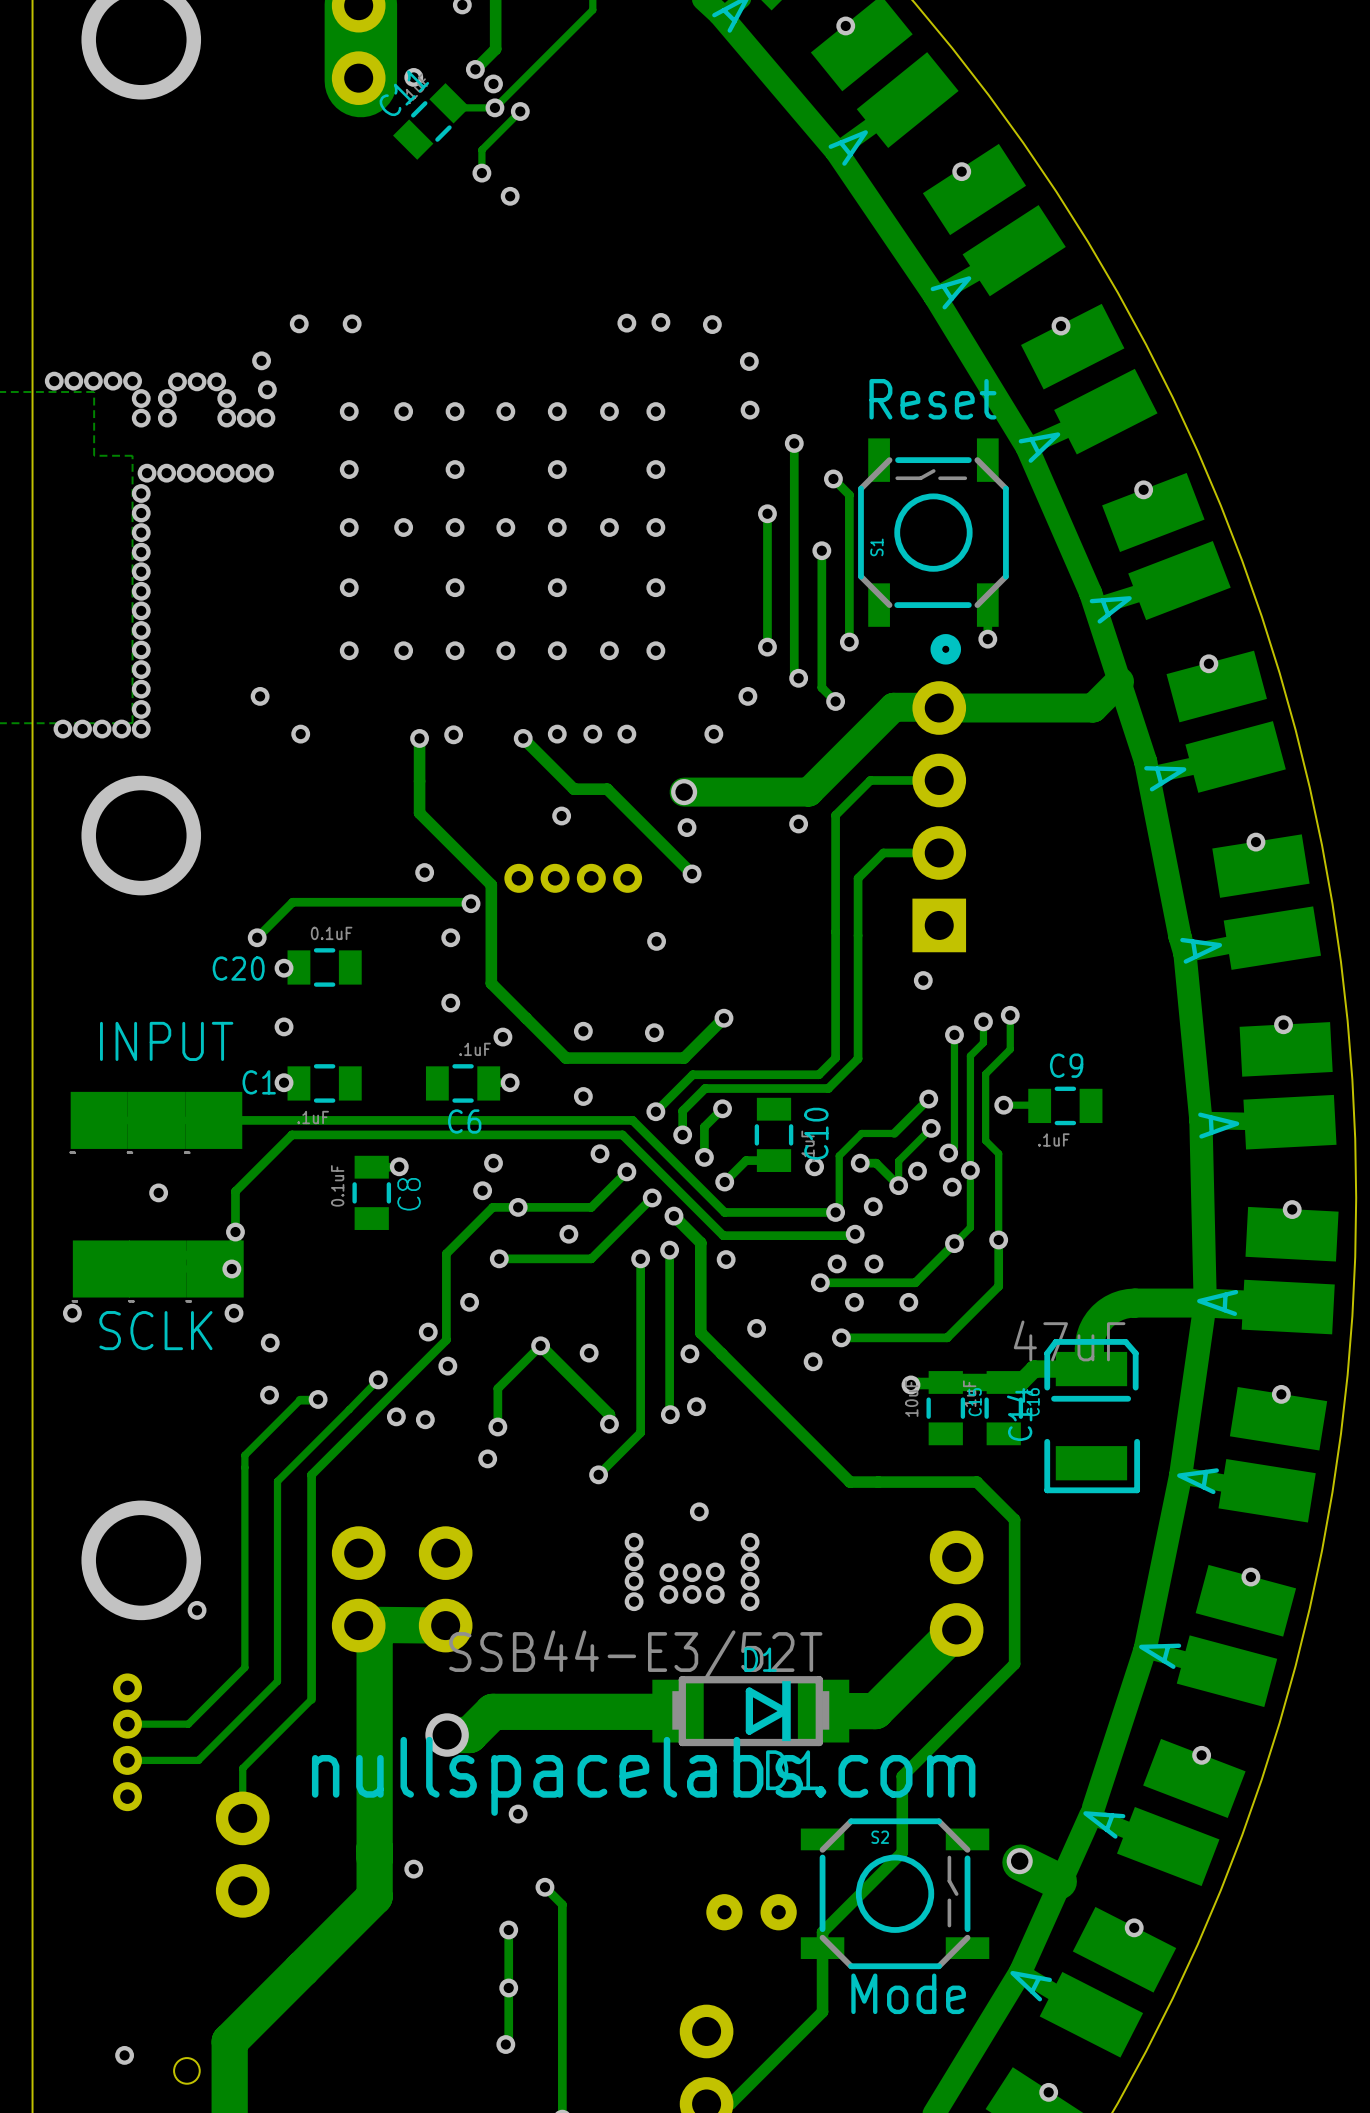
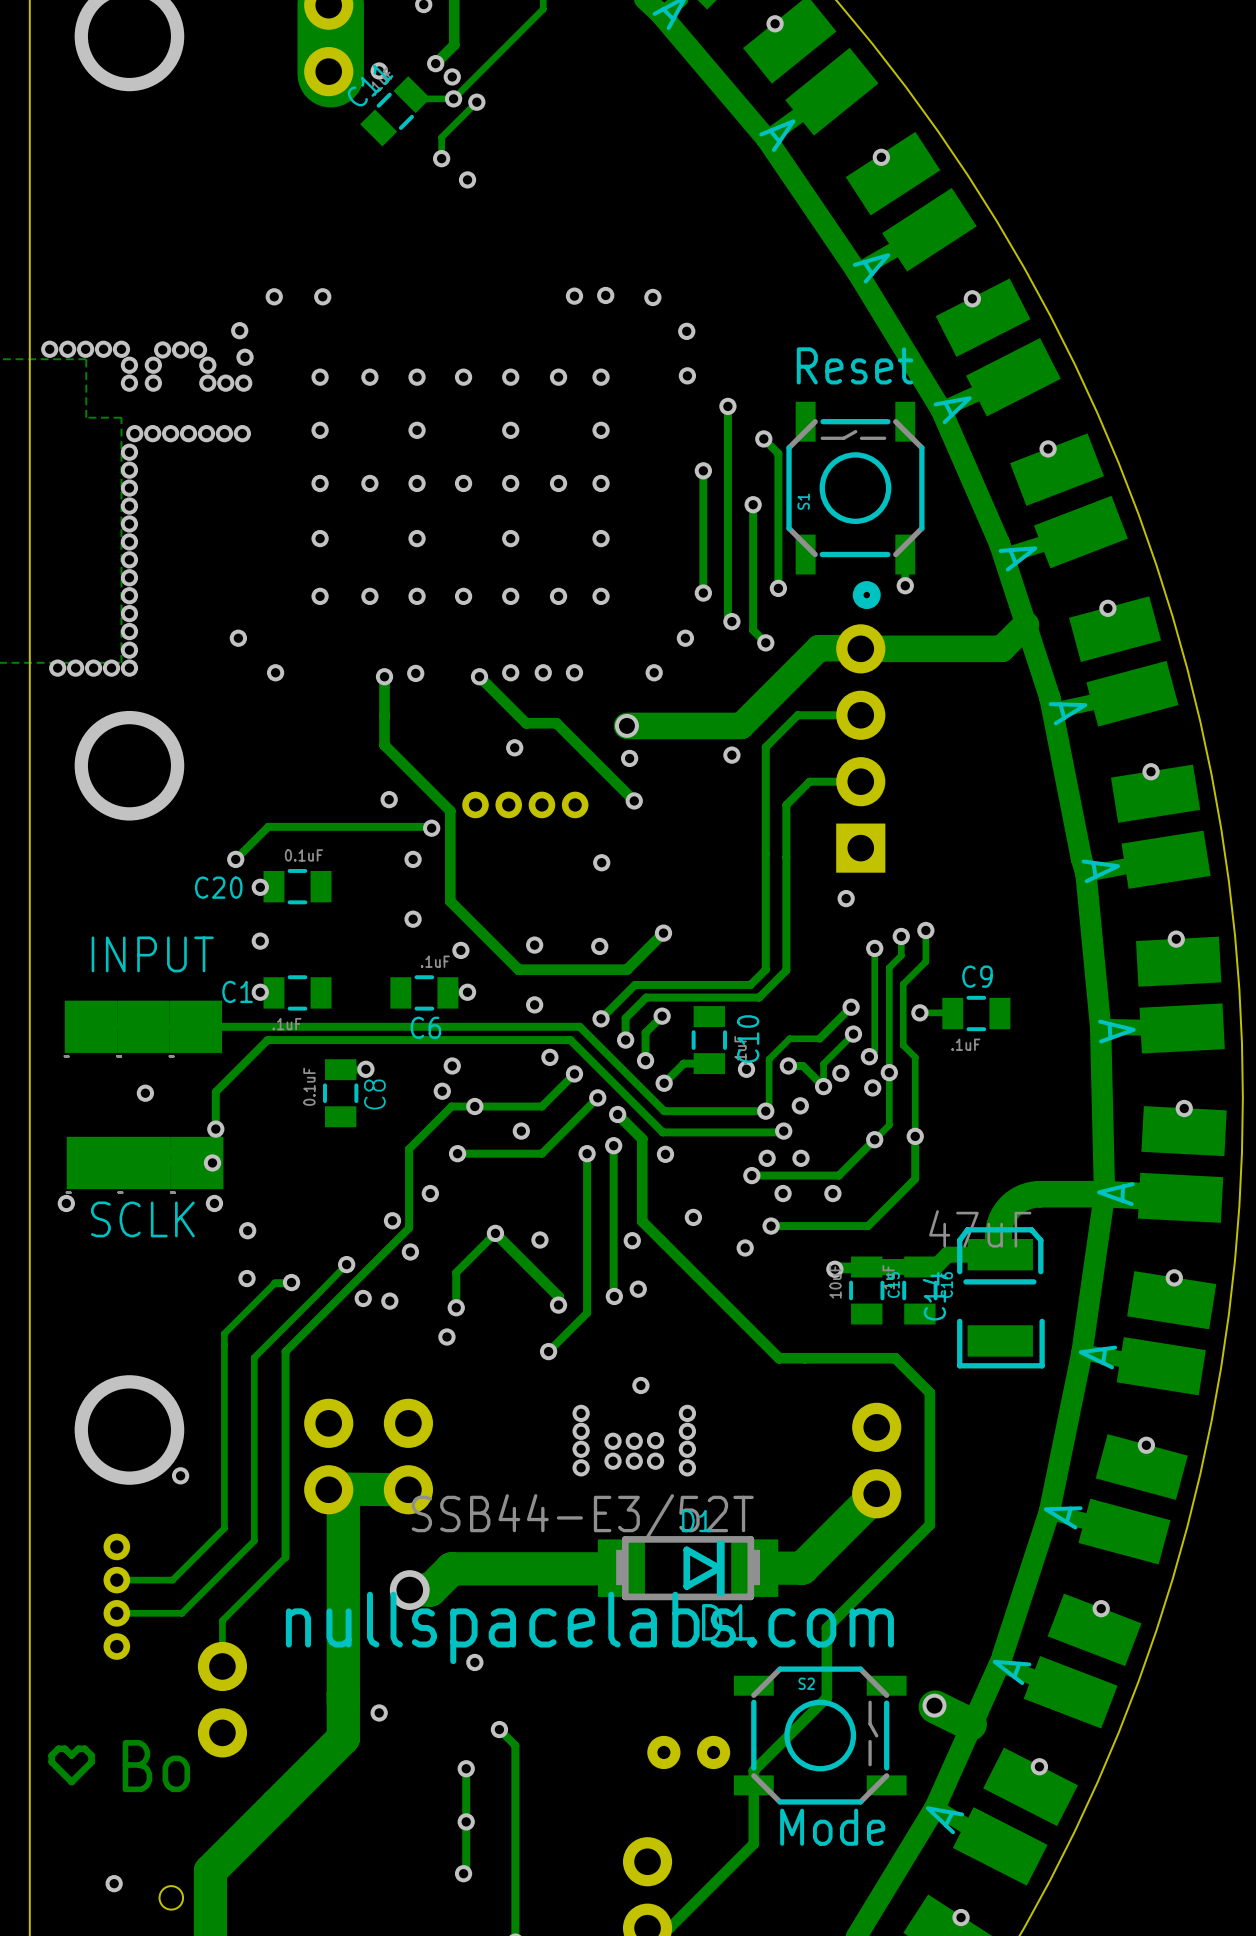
track: none -> (84, 1748) (78, 1748) (71, 1755) (65, 1748) (58, 1748) (51, 1755) (51, 1762) (71, 1782) (91, 1762) (91, 1755) (84, 1748)
text: none -> Bo (156, 1766)

